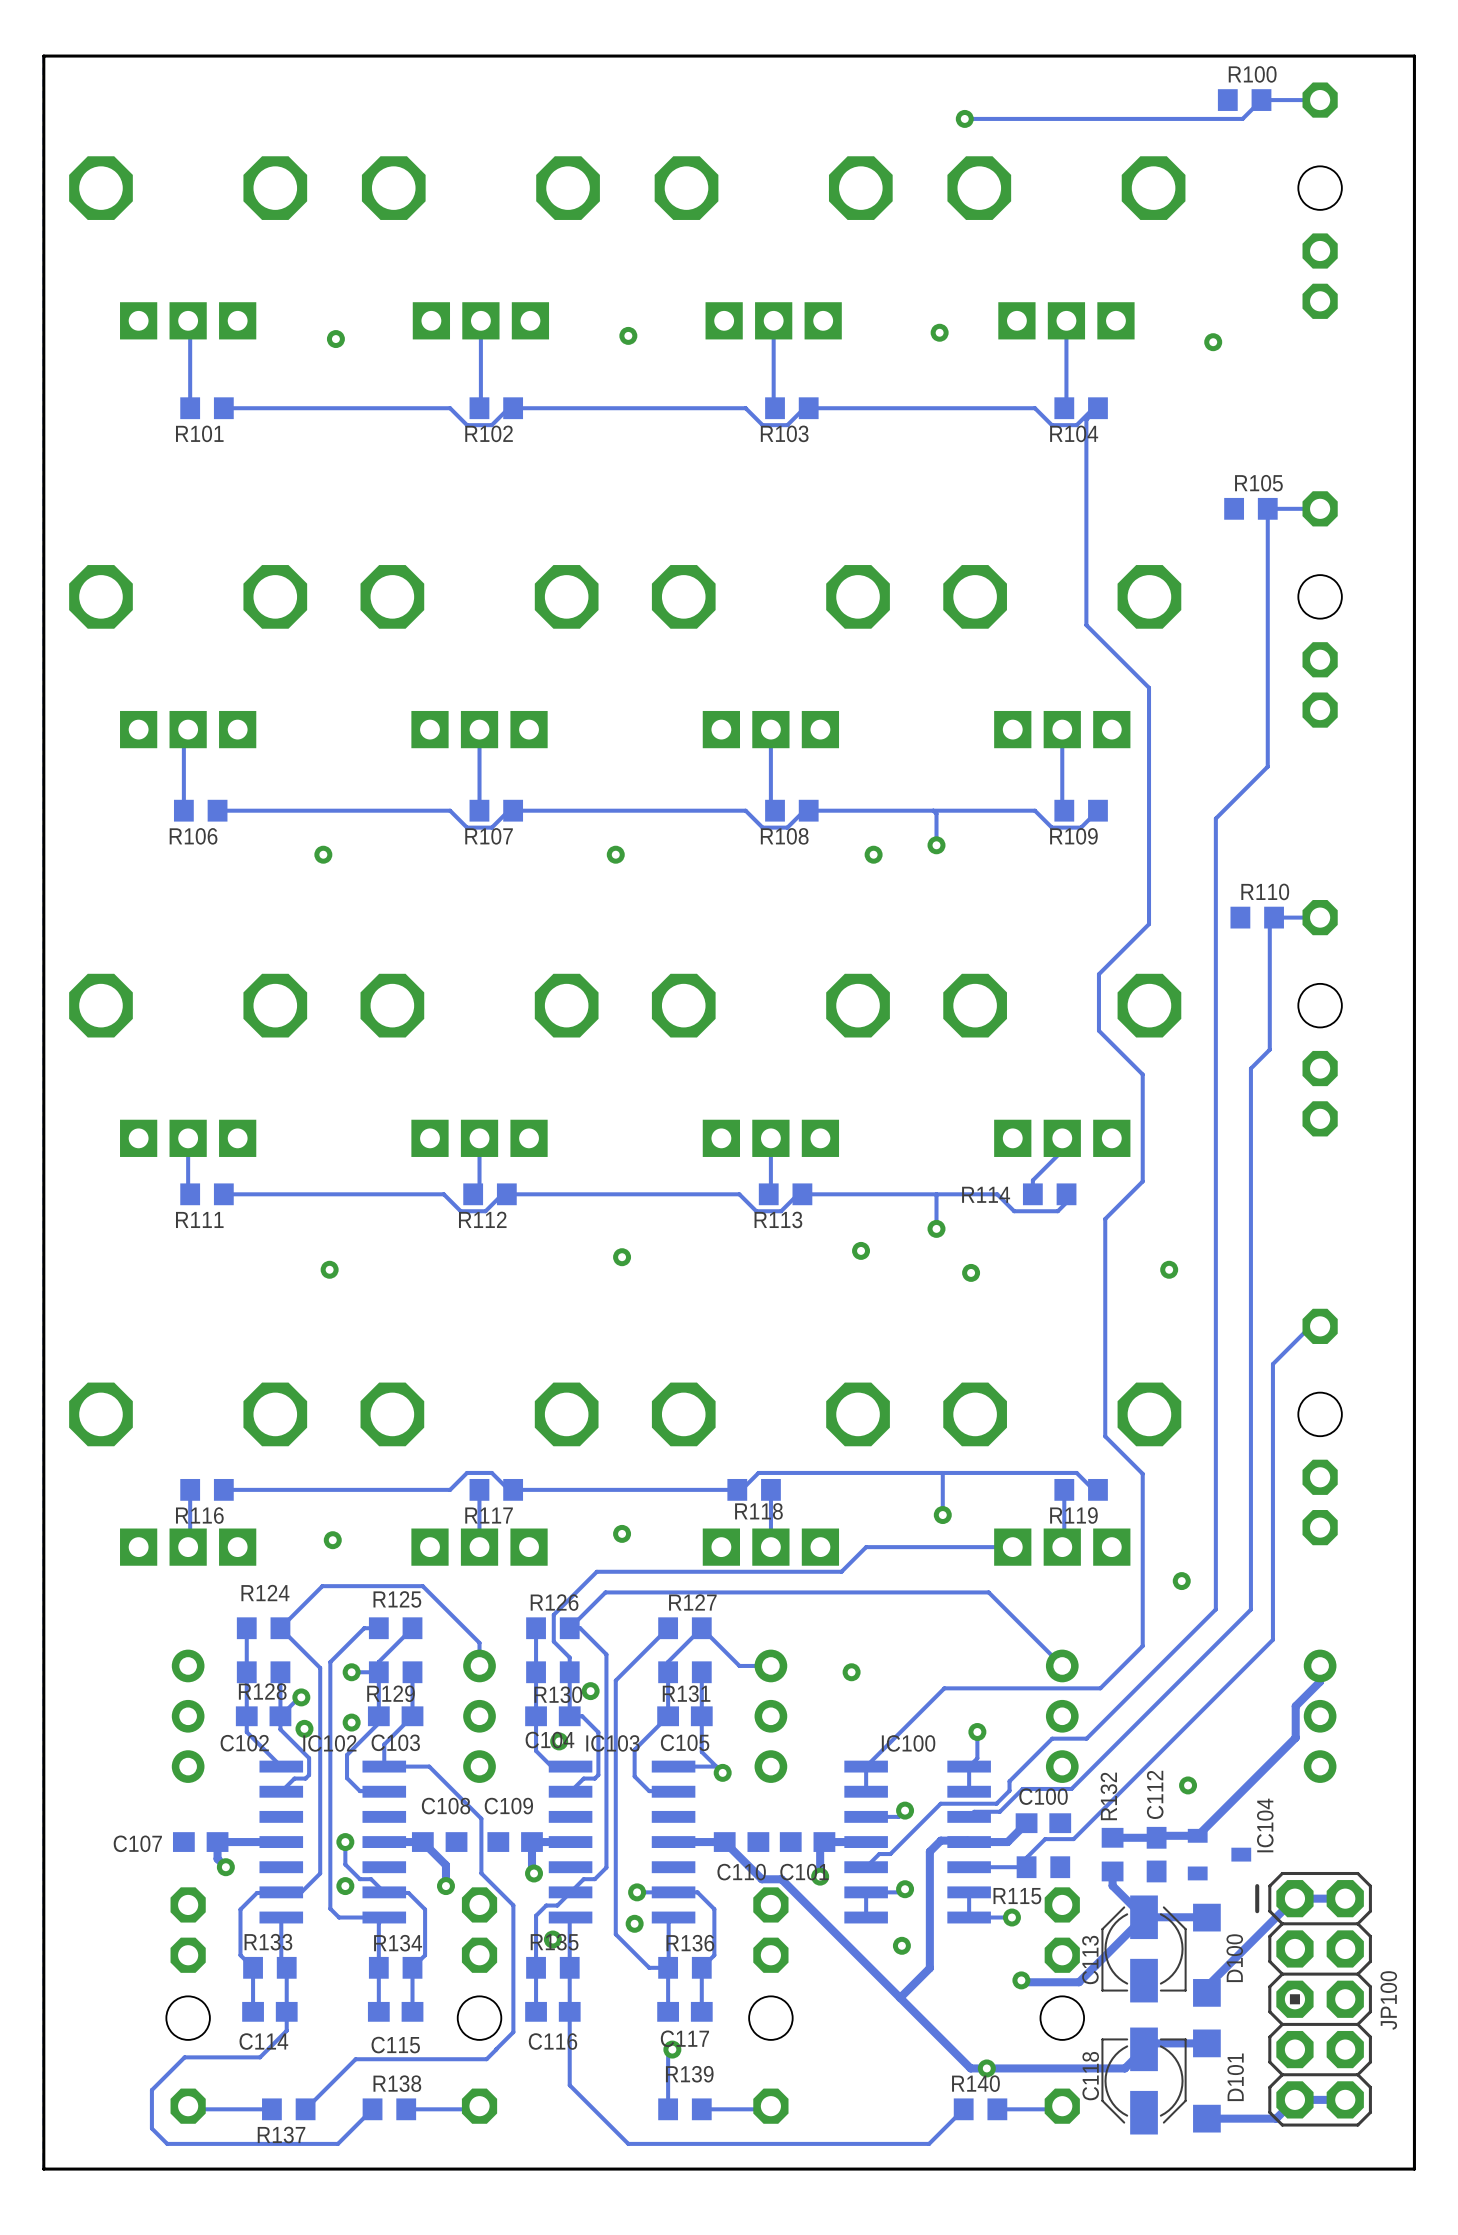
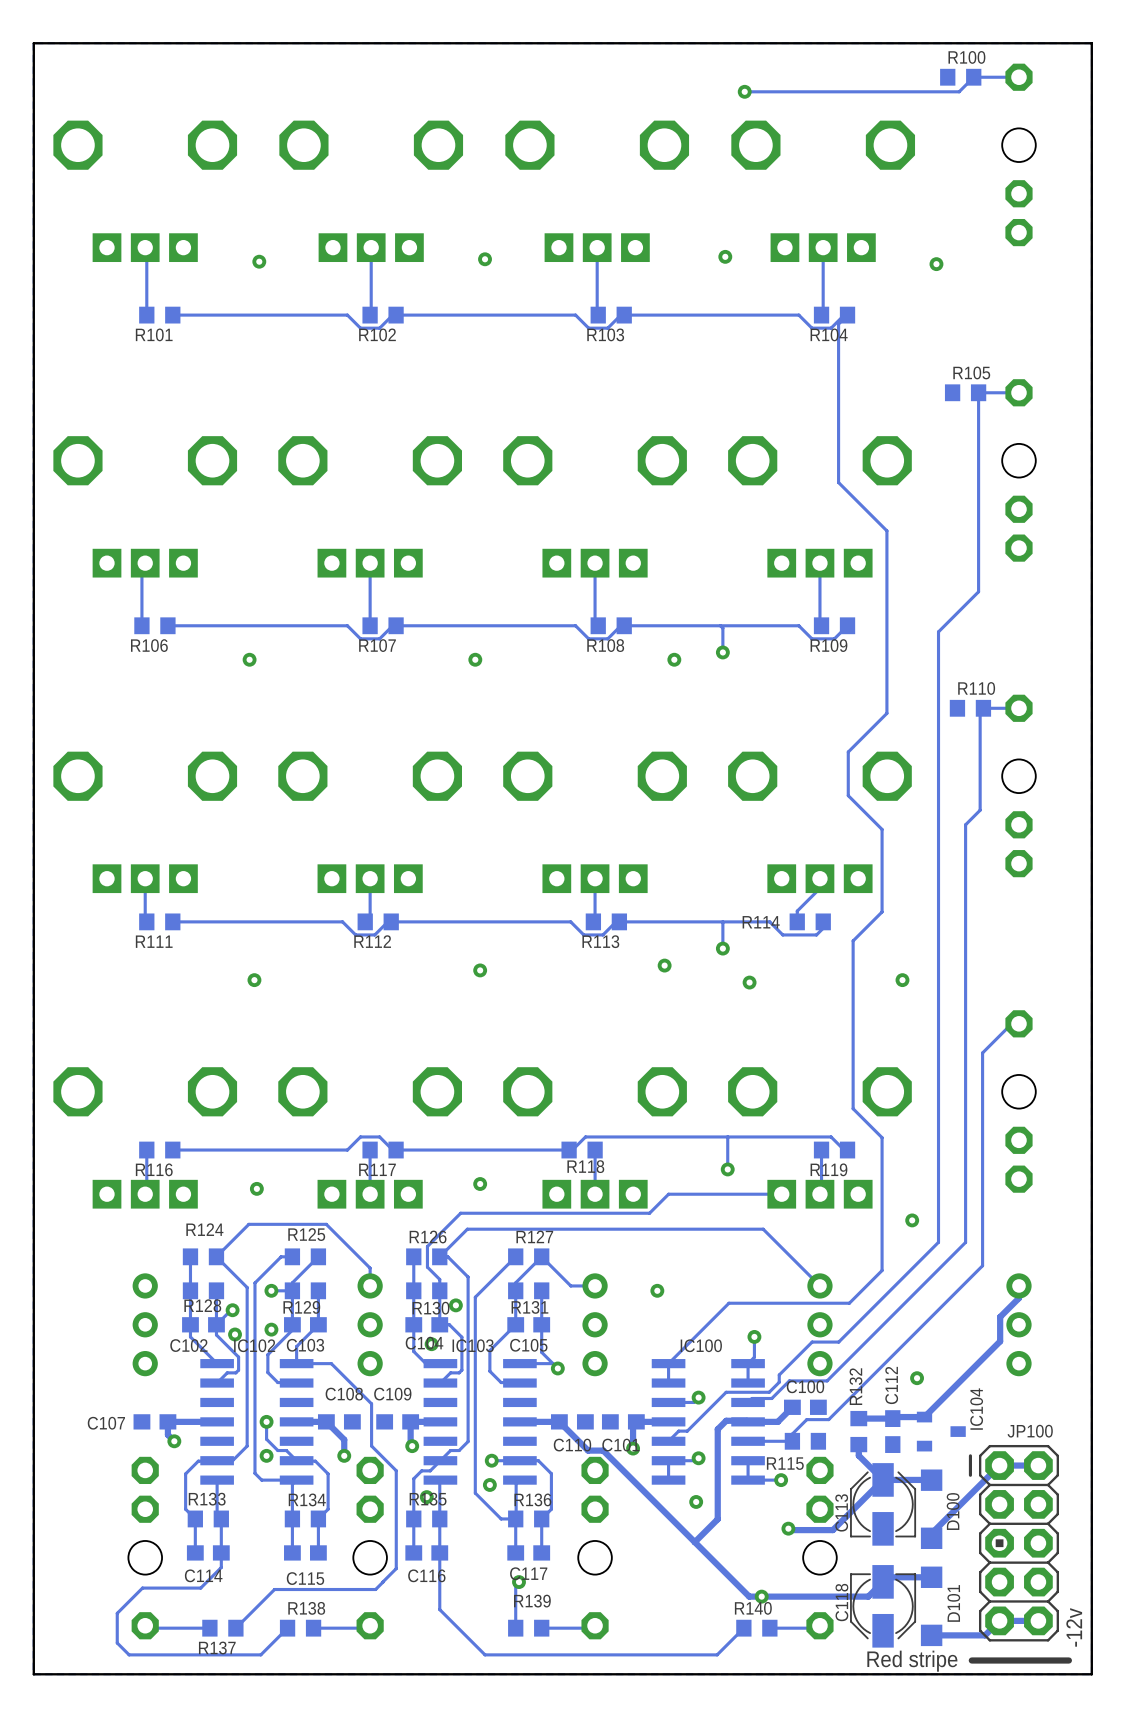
JP100 name rotation: 0° (1388, 2000) -> 90° clockwise (1030, 1431)
JP100 name position: JP100 (1388, 2000) -> JP100 (1030, 1431)
text: none -> -12v (1074, 1627)
line: none -> (1068, 1660) (971, 1660)
text: none -> Red stripe (912, 1661)

